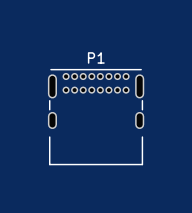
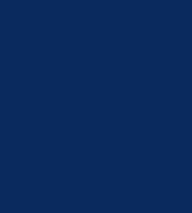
P1: (96, 117) -> none

